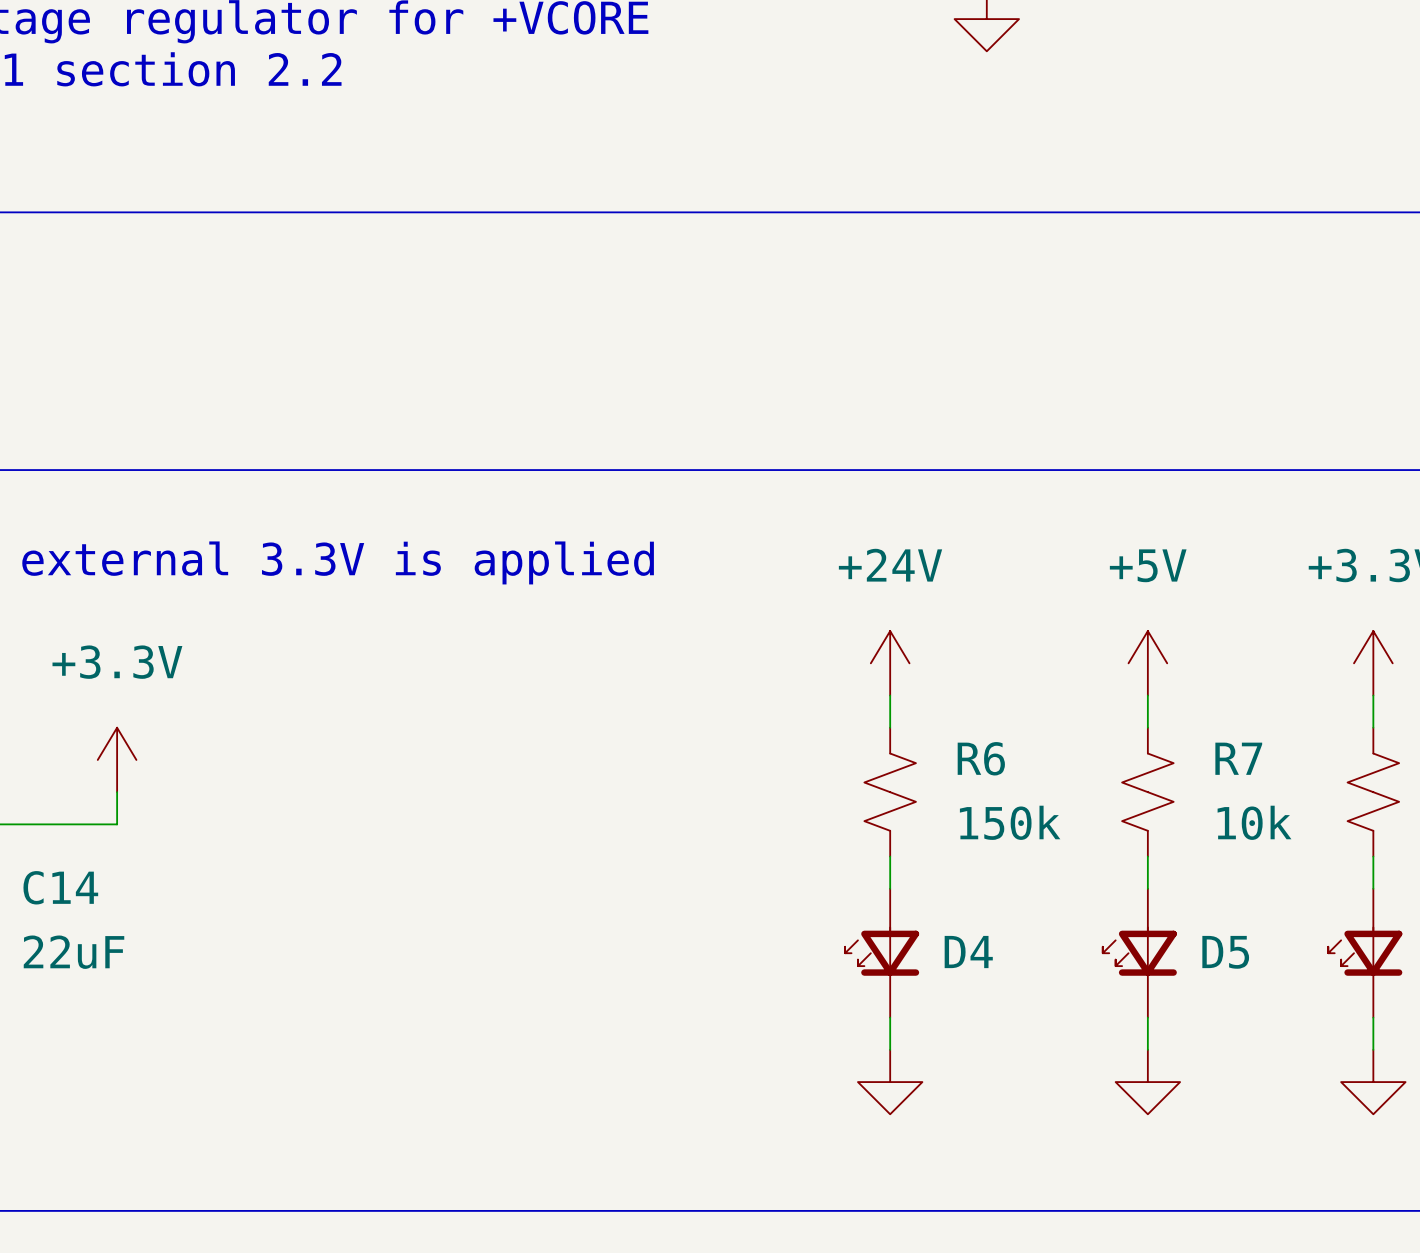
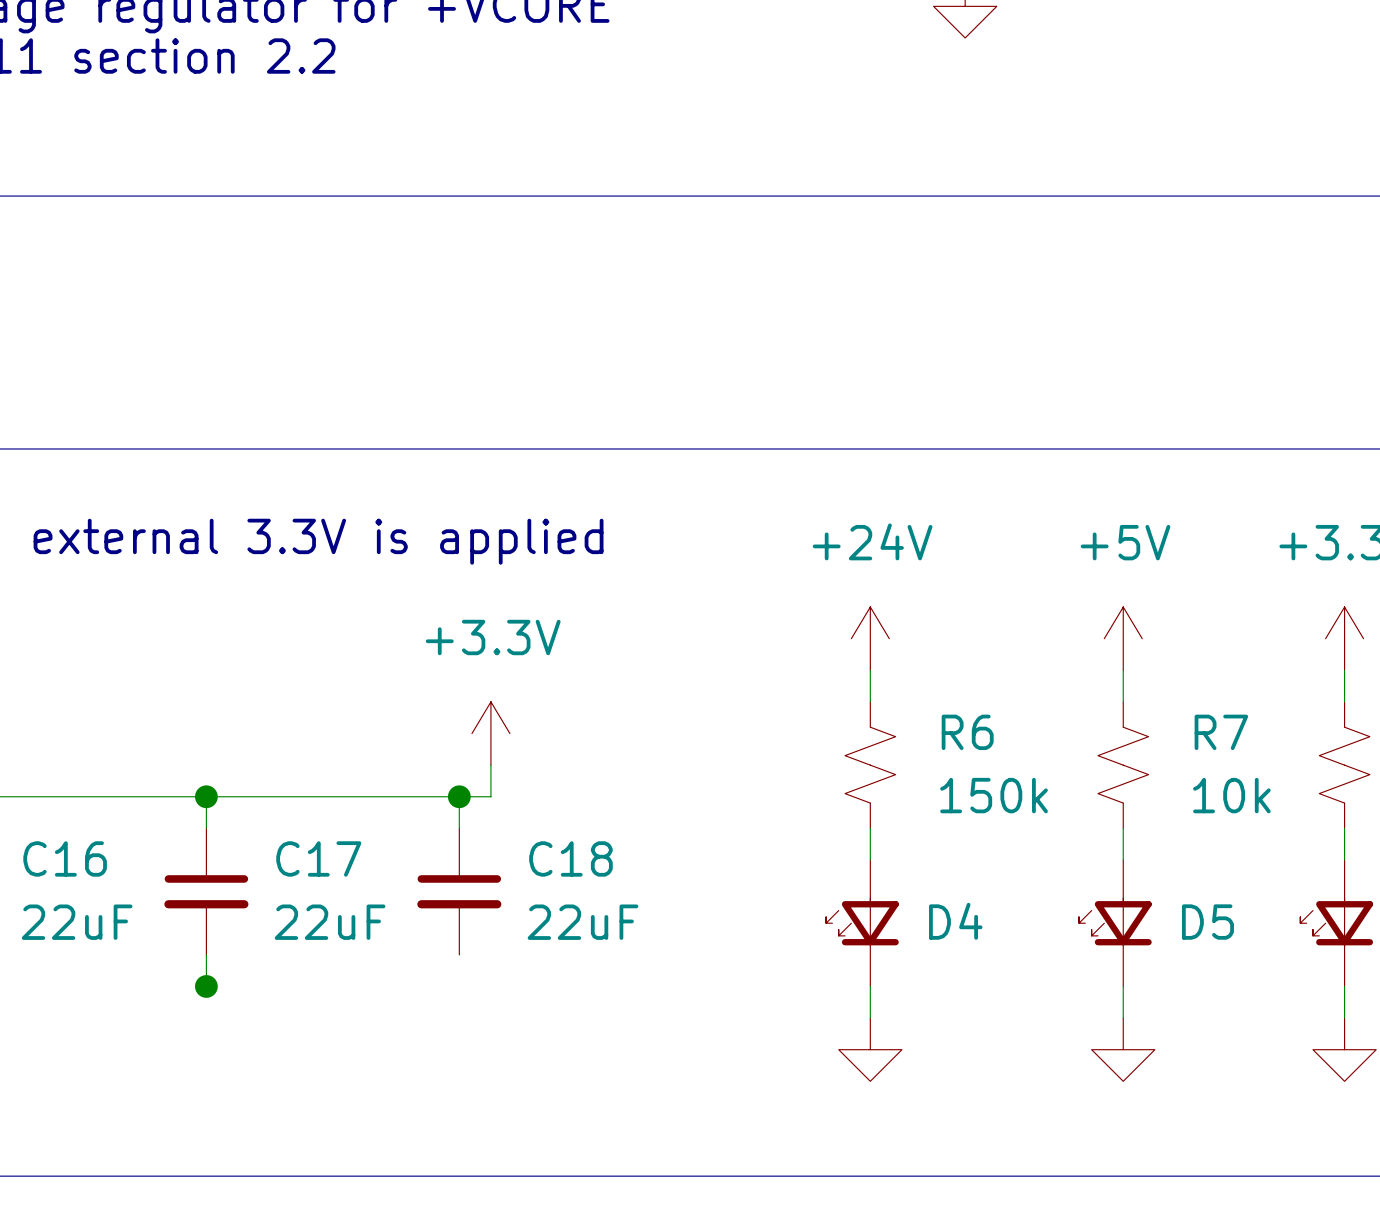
power symbol position: +3.3V (117, 759) -> +3.3V (490, 733)
wire: (117, 792) (117, 824) -> (490, 765) (490, 796) (111, 796)
wire: none -> (206, 796) (206, 828)
junction: none -> (206, 796)
wire: none -> (459, 796) (459, 828)
junction: none -> (459, 796)
C14 name: C14 (60, 887) -> C16 (65, 858)
C17: none -> 22uF (206, 891)
C18: none -> 22uF (459, 891)
wire: none -> (206, 954) (206, 986)
junction: none -> (206, 986)

